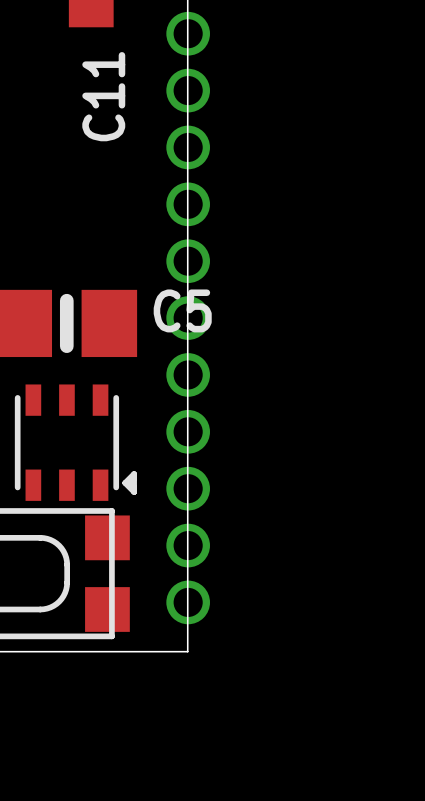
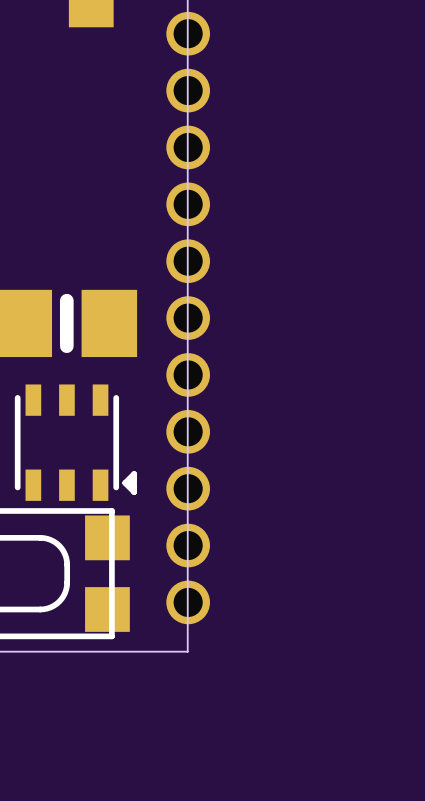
C11 name: C11 (103, 96) -> none
C5 name: C5 (182, 310) -> none

